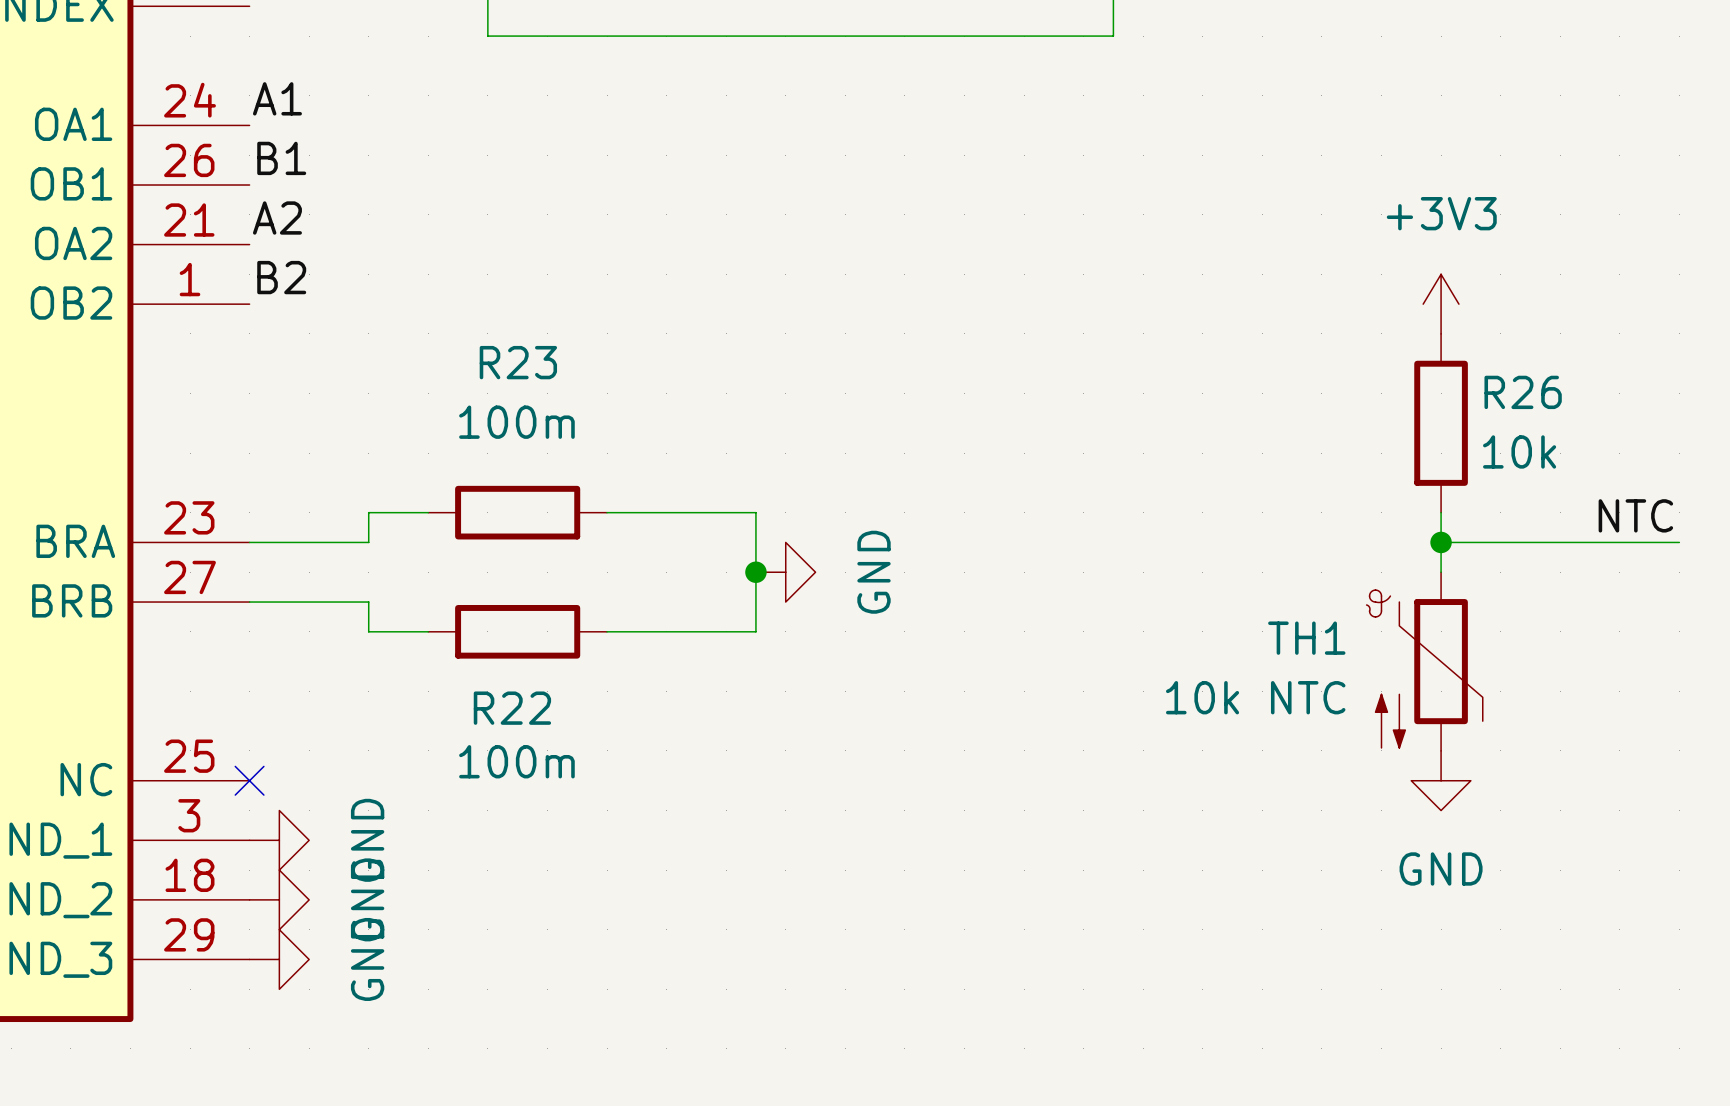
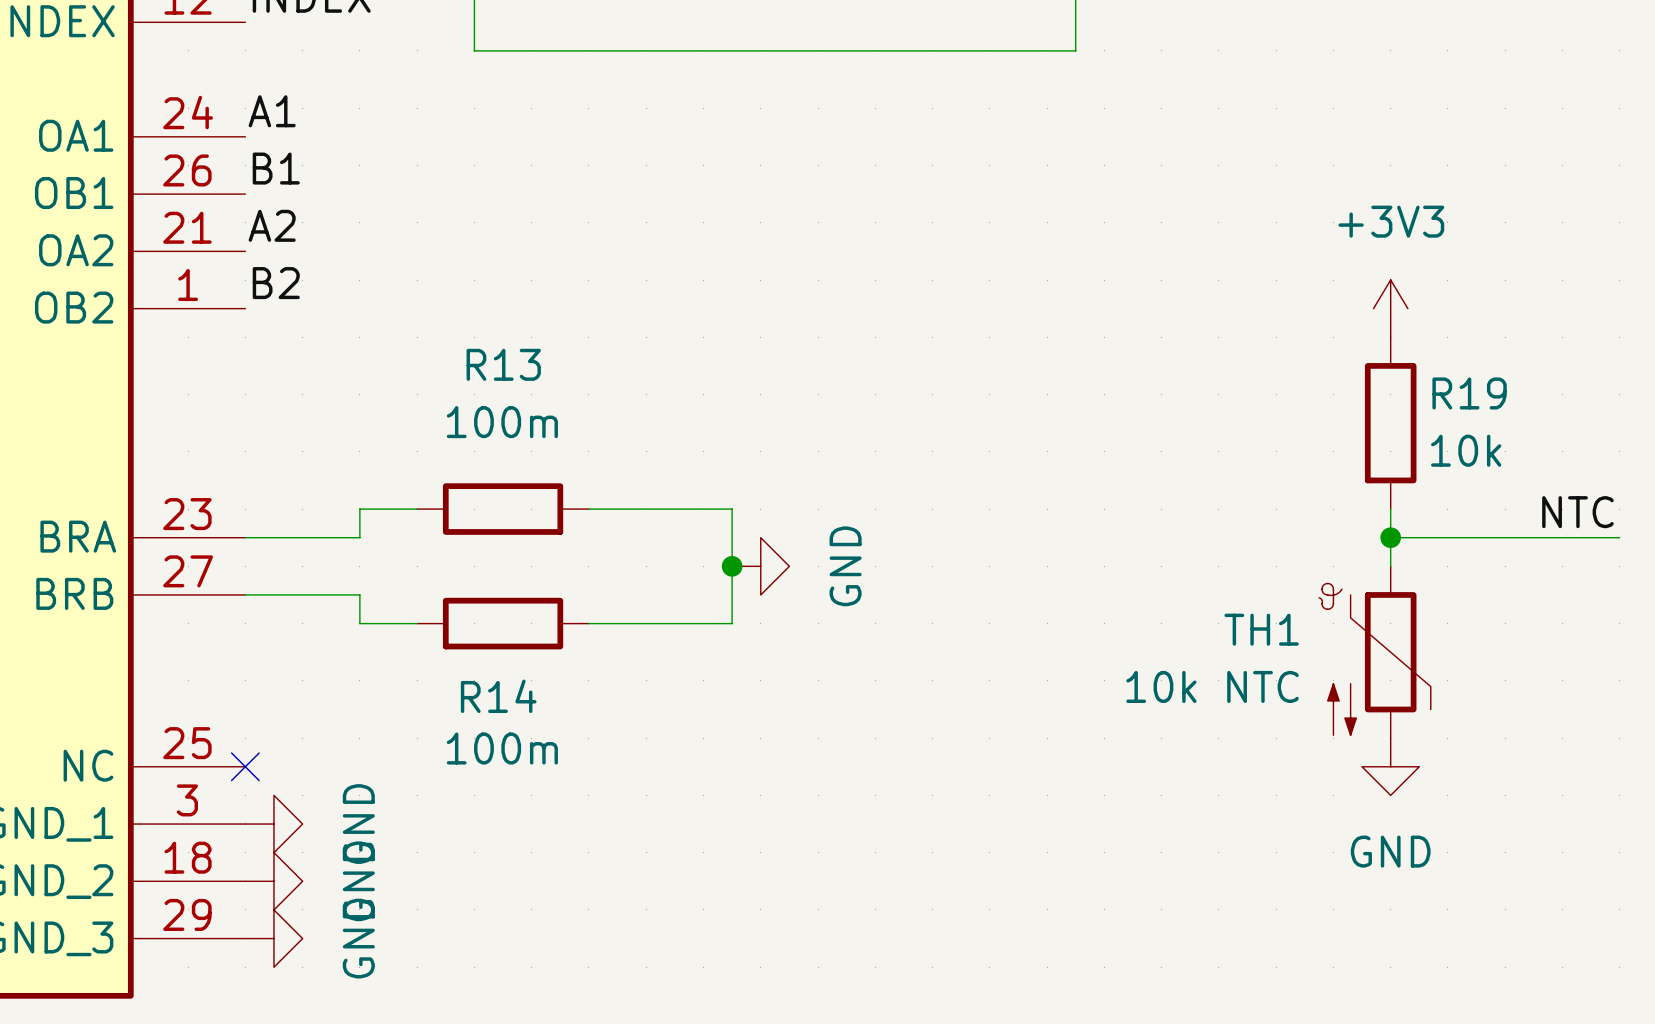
R23 name: R23 (518, 362) -> R13 (503, 364)
R26 name: R26 (1523, 392) -> R19 (1469, 393)
R22 name: R22 (512, 708) -> R14 (498, 696)

